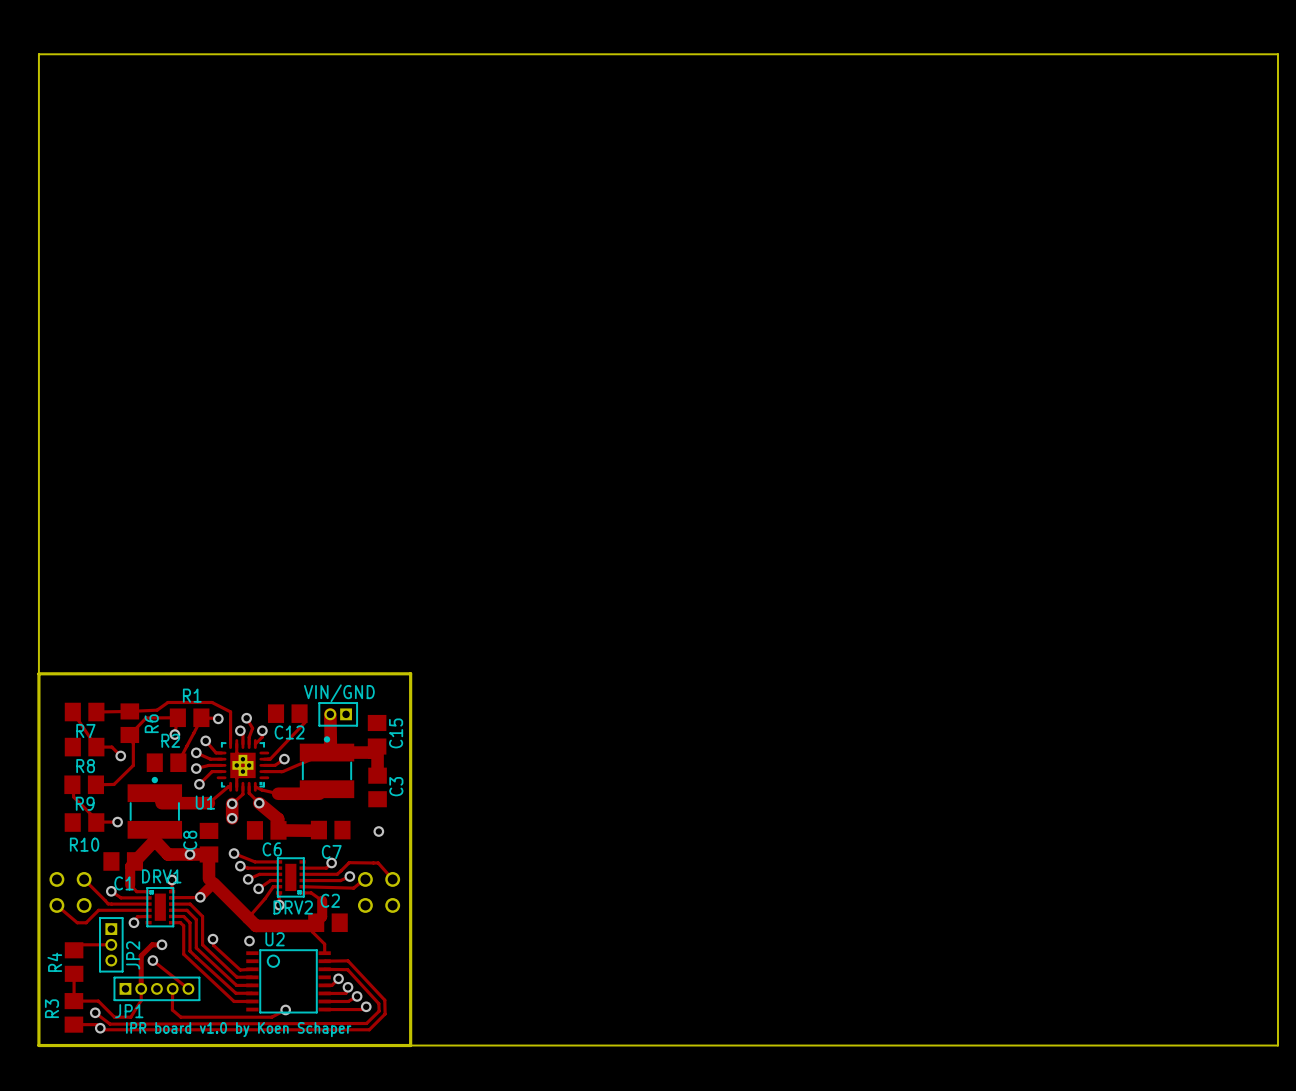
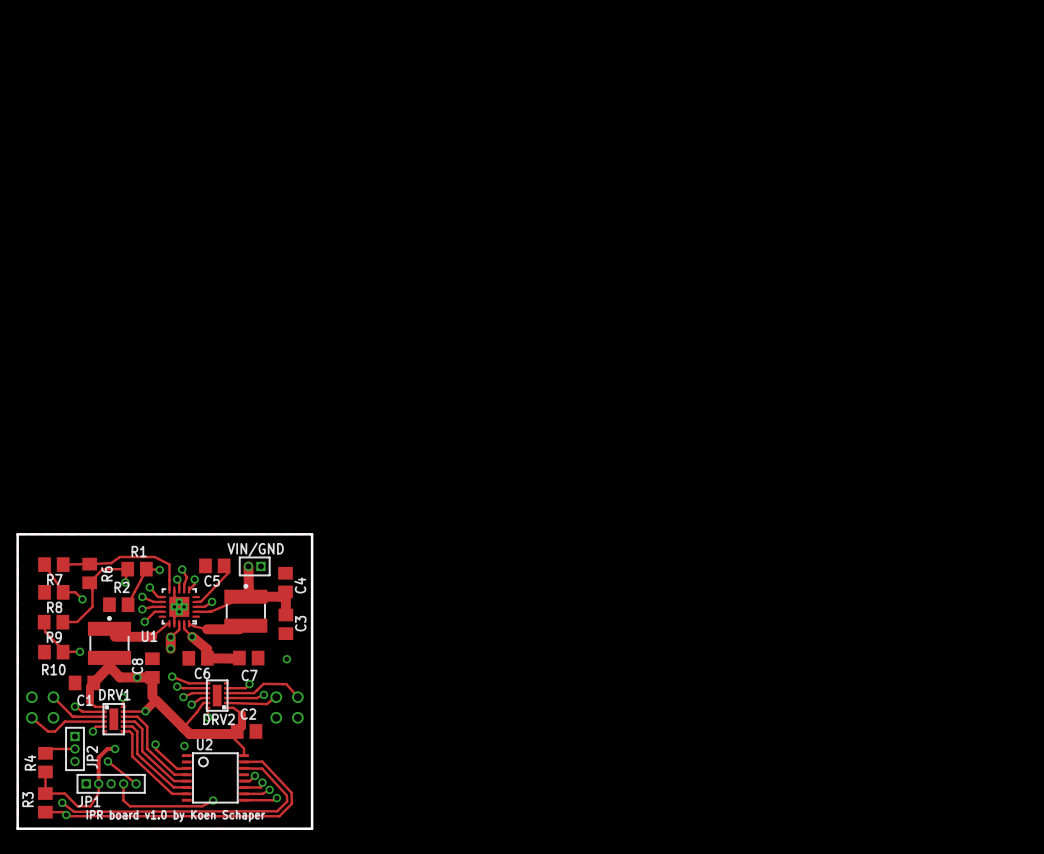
board edge: (38, 673) (38, 54) (1277, 54) (1277, 1045) (410, 1045) -> none
C12 name: C12 (289, 732) -> C5 (212, 581)
C15 name: C15 (396, 733) -> C4 (300, 585)

